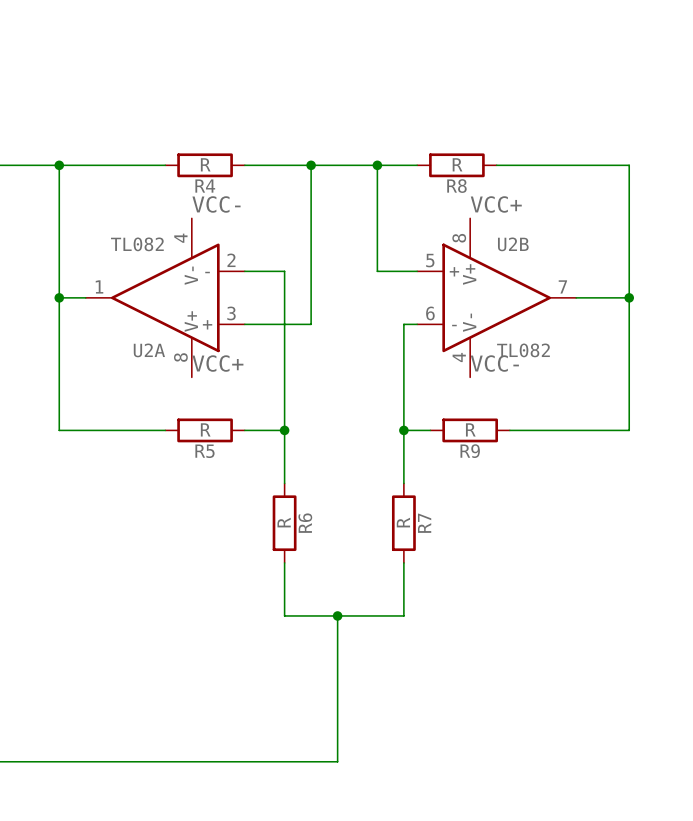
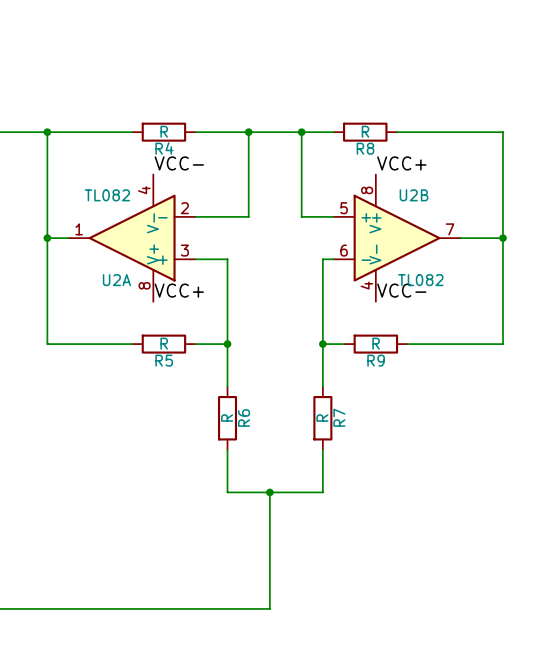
wire: (284, 271) (284, 324) (311, 324) (311, 271) -> (227, 216) (248, 216)

